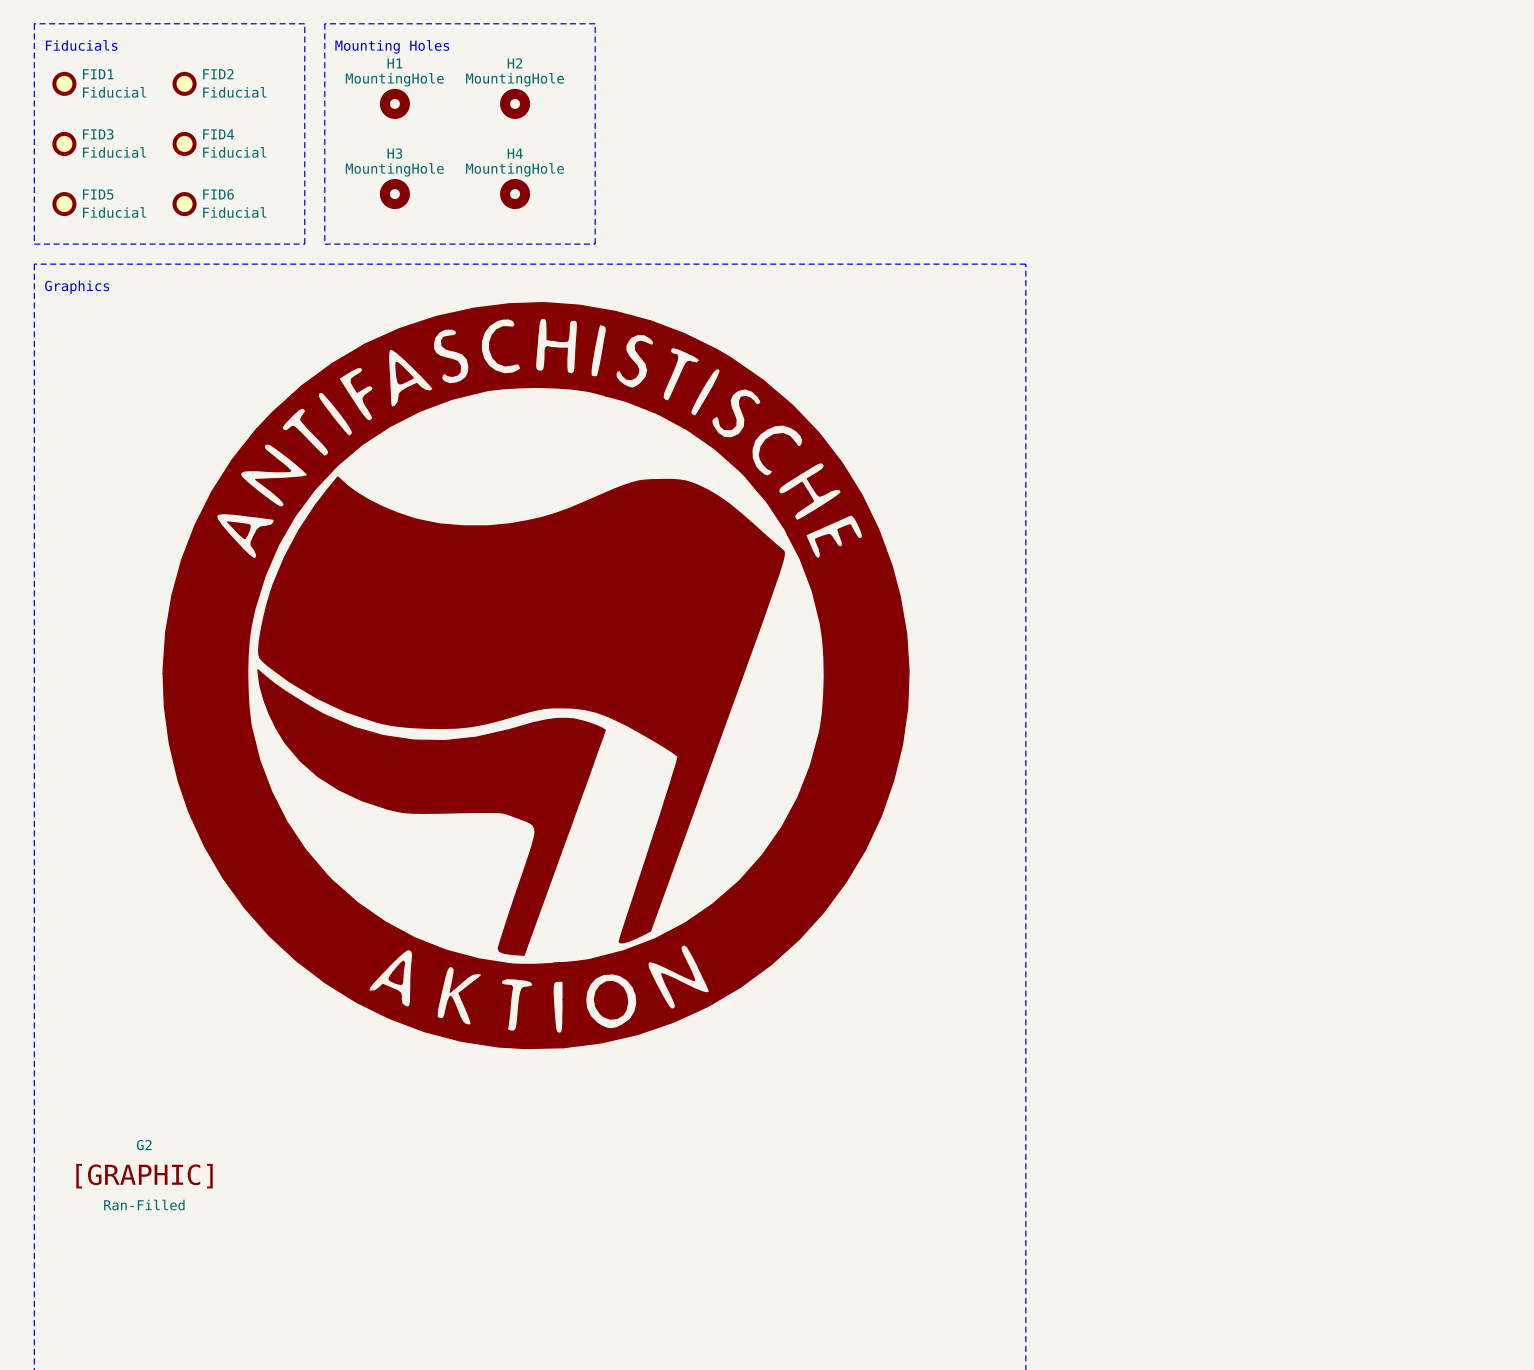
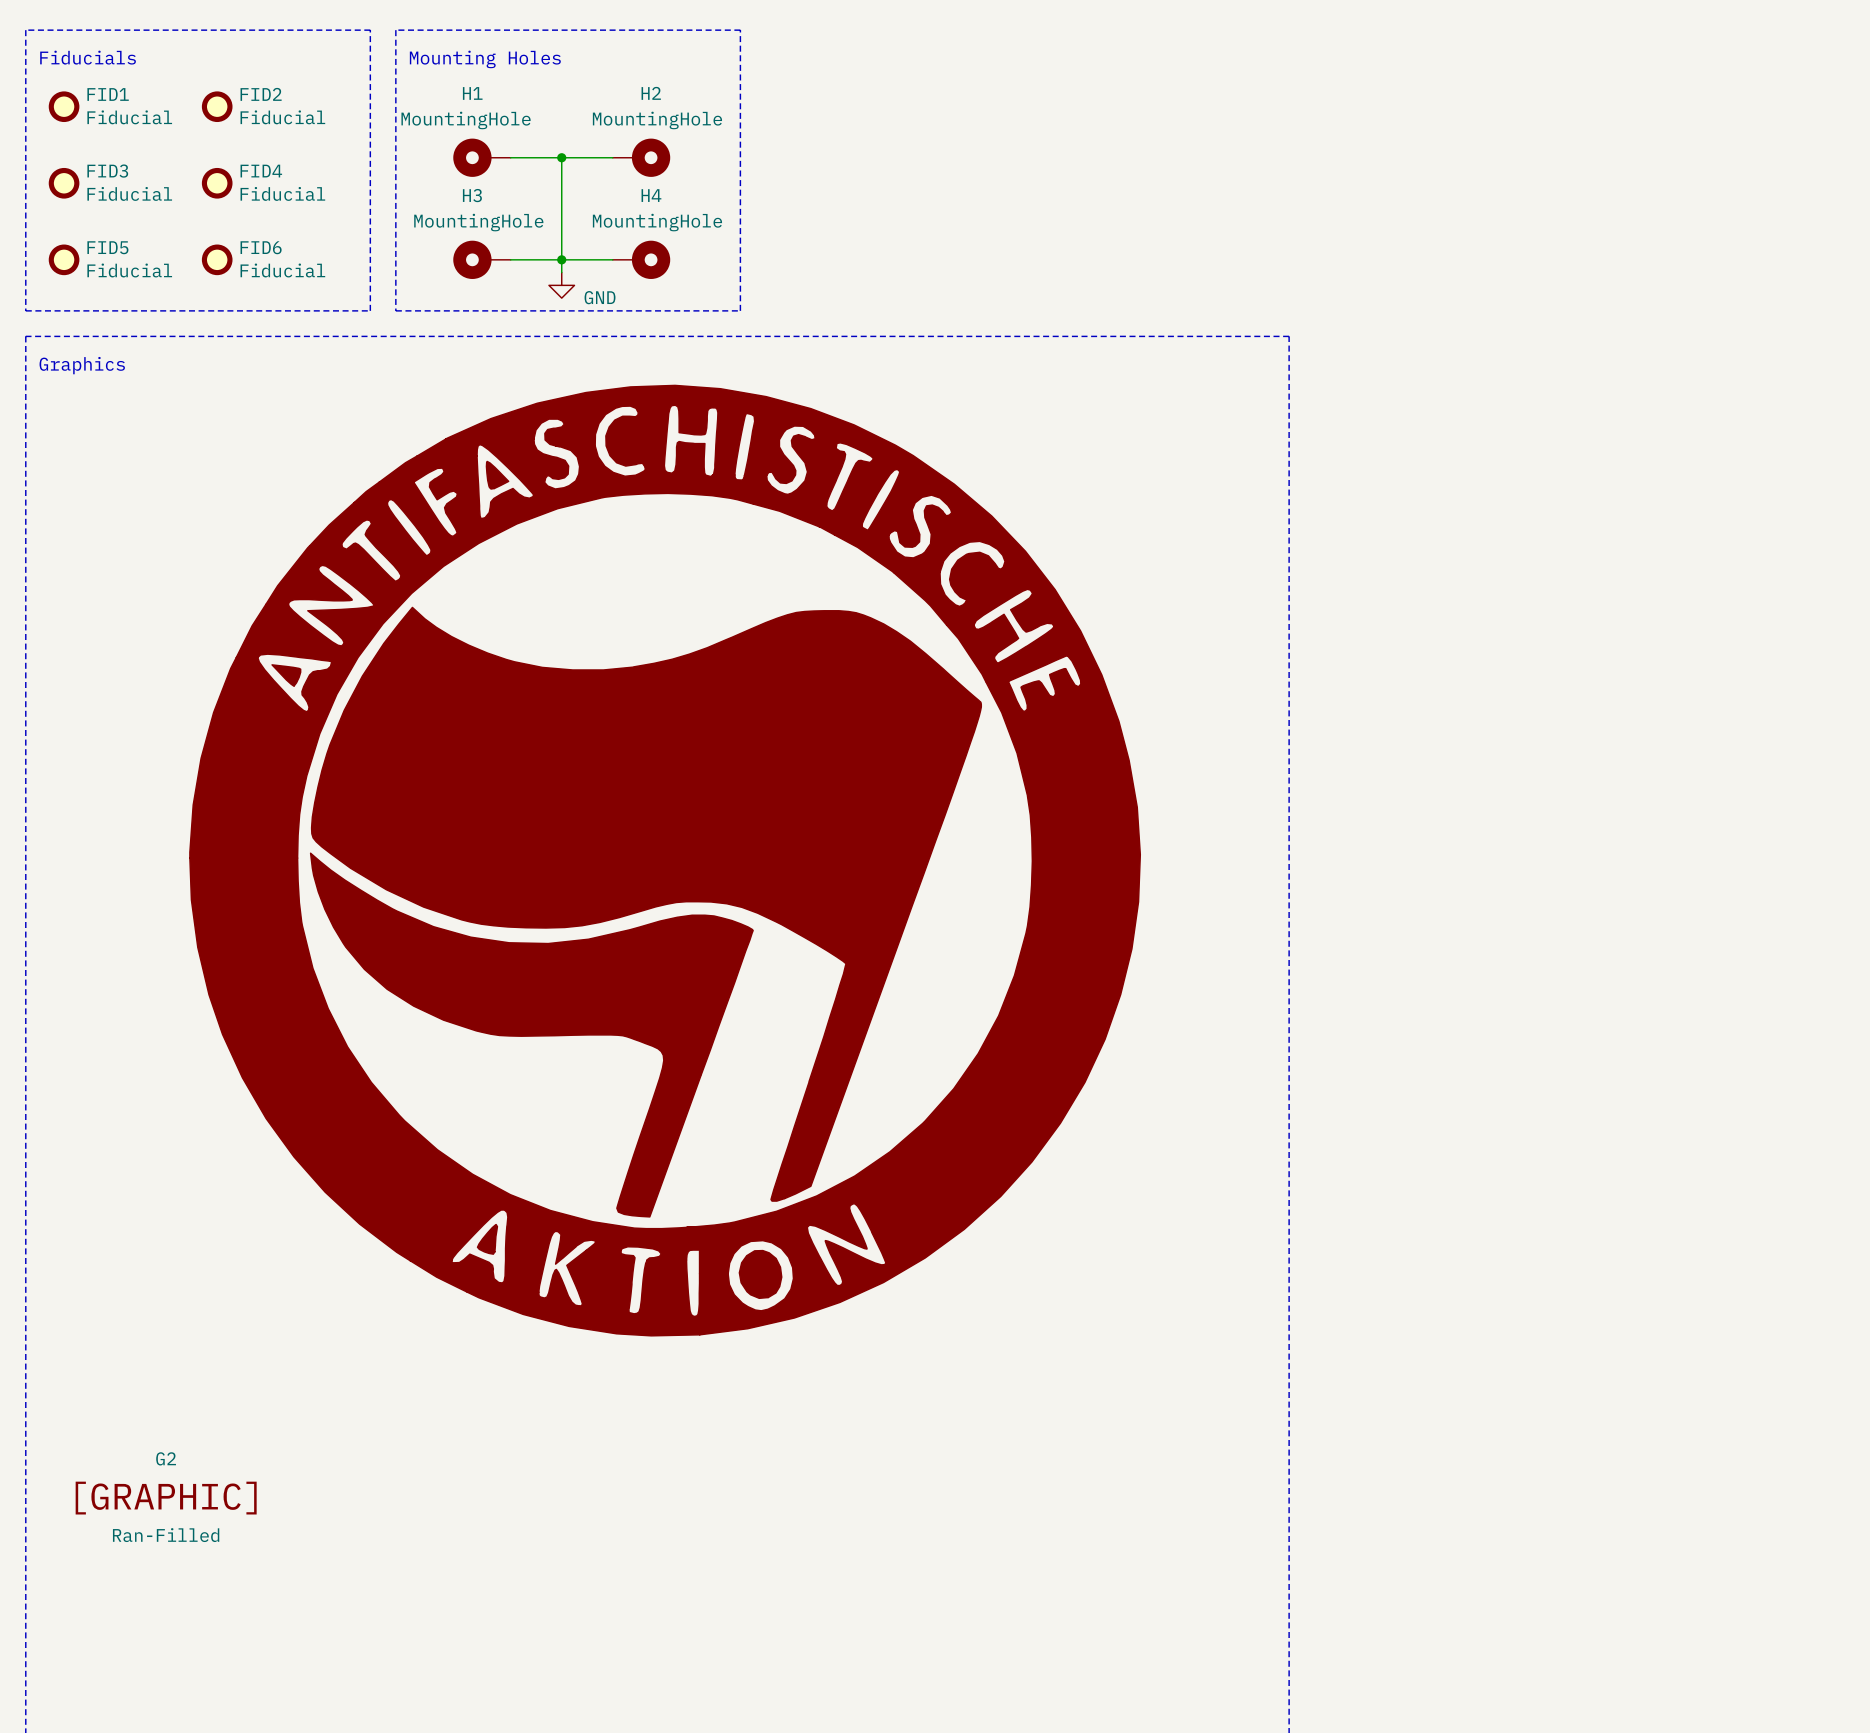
H1 symbol: [379, 88, 410, 119] -> [453, 138, 511, 177]
H2 symbol: [500, 88, 531, 119] -> [612, 138, 671, 177]
wire: none -> (510, 157) (612, 157)
wire: none -> (561, 157) (561, 272)
junction: none -> (561, 157)
H3 symbol: [379, 179, 410, 210] -> [453, 240, 511, 279]
H4 symbol: [500, 179, 531, 210] -> [612, 240, 671, 279]
wire: none -> (510, 259) (612, 259)
junction: none -> (561, 259)
power symbol: none -> GND (561, 285)

